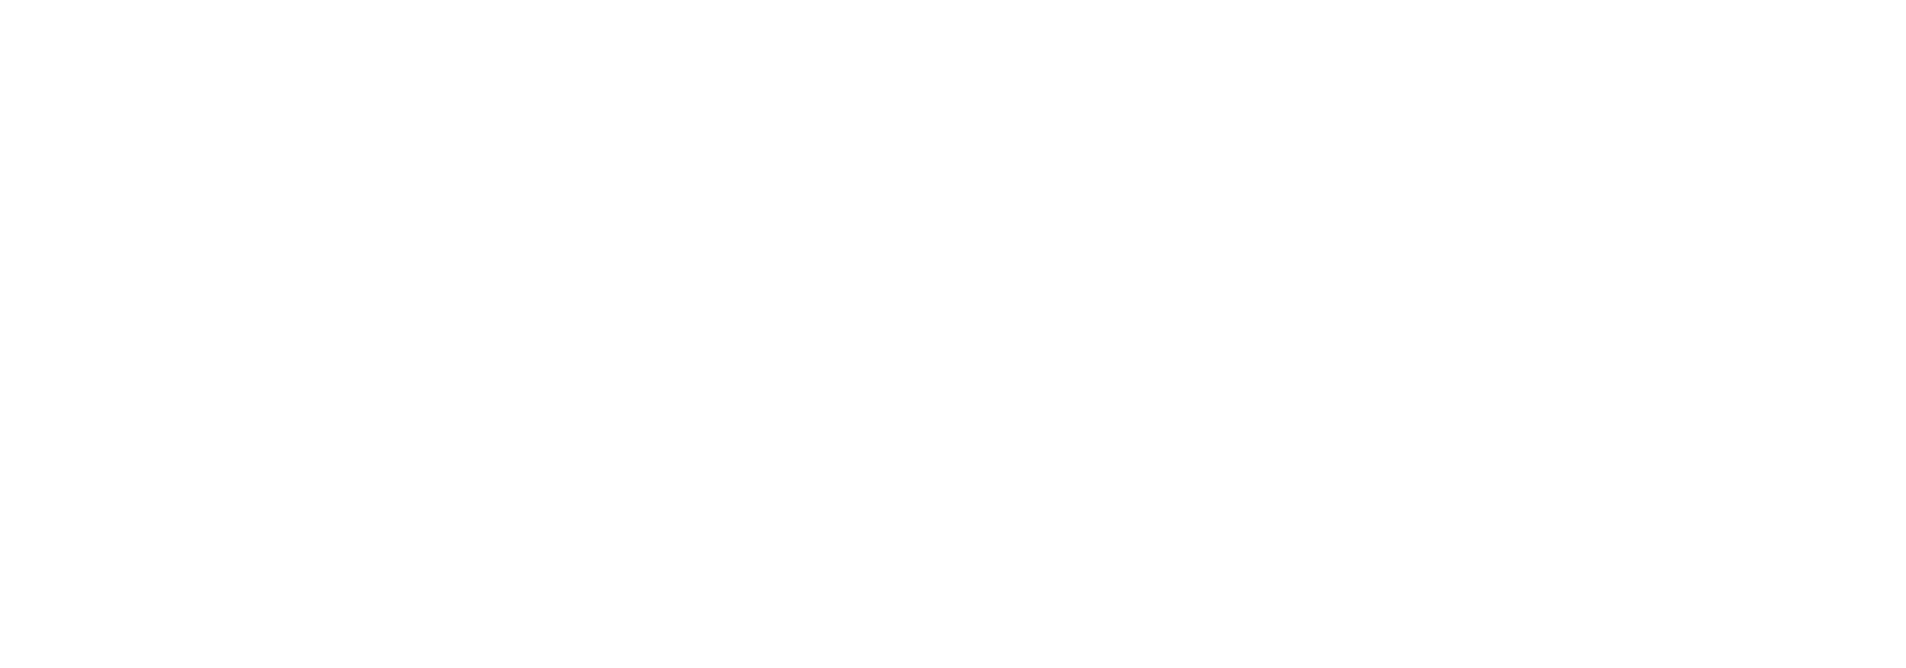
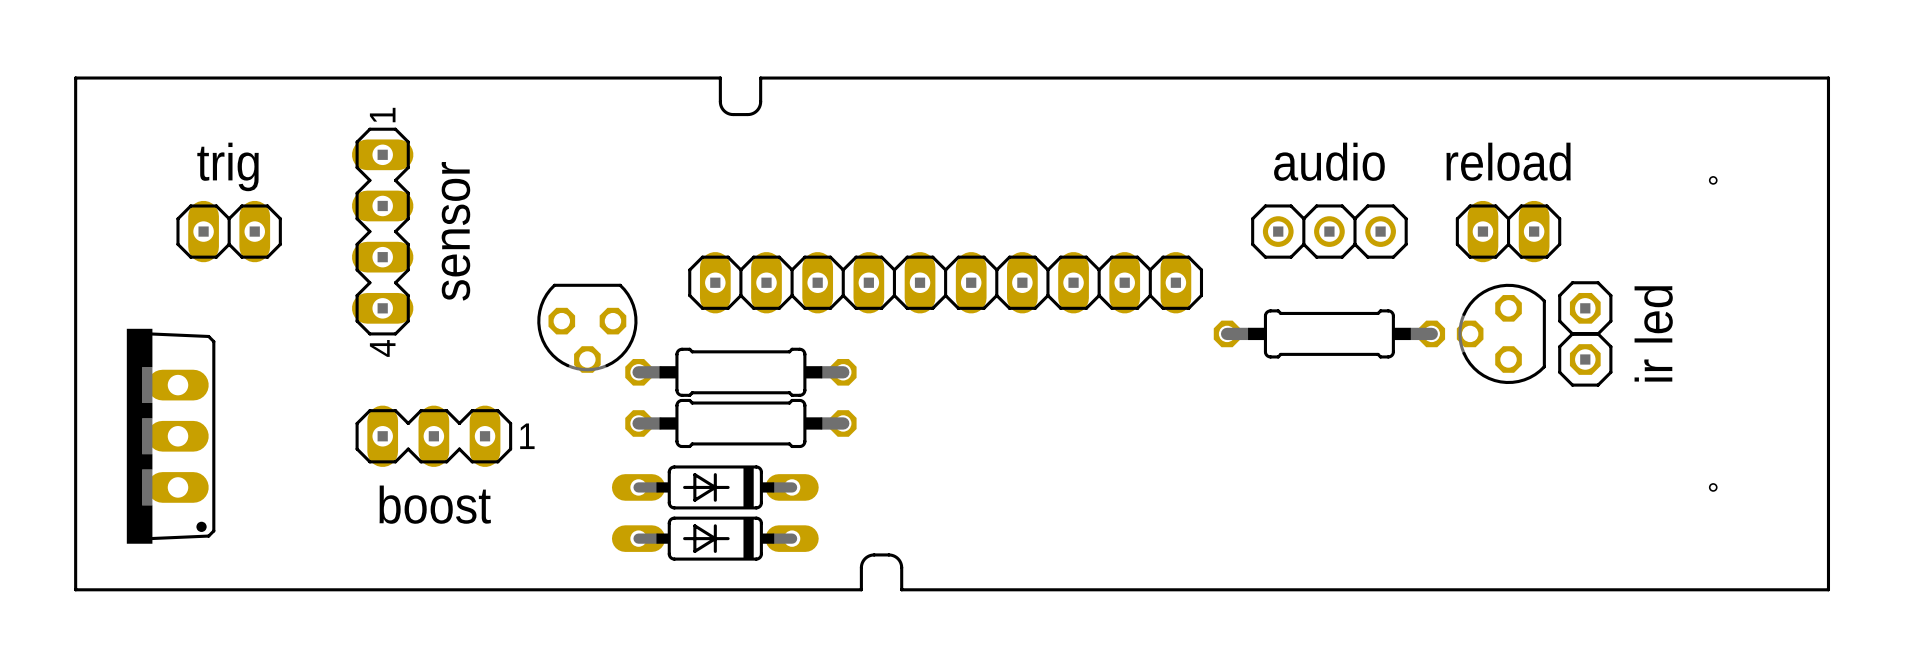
board edge: none -> (75, 78) (720, 78) (721, 106) (725, 111) (733, 114) (751, 114) (758, 109) (760, 103) (760, 78) (1828, 78) (1828, 589) (901, 589) (900, 562) (896, 557) (888, 554) (870, 555) (864, 559) (861, 566) (861, 589) (75, 589) (75, 78)
text: none -> audio (1329, 161)
text: none -> reload (1508, 161)
text: none -> trig (228, 166)
hole: none -> (1713, 180)
part: none -> (229, 231)
part: none -> (382, 231)
text: none -> sensor (455, 231)
part: none -> (1329, 231)
part: none -> (1508, 231)
part: none -> (945, 282)
part: none -> (1585, 308)
part: none -> (587, 328)
part: none -> (1329, 333)
part: none -> (1501, 333)
text: none -> ir led (1653, 333)
part: none -> (1585, 359)
part: none -> (740, 372)
part: none -> (740, 423)
part: none -> (171, 436)
part: none -> (433, 436)
part: none -> (715, 487)
hole: none -> (1713, 487)
text: none -> boost (435, 504)
part: none -> (715, 538)

